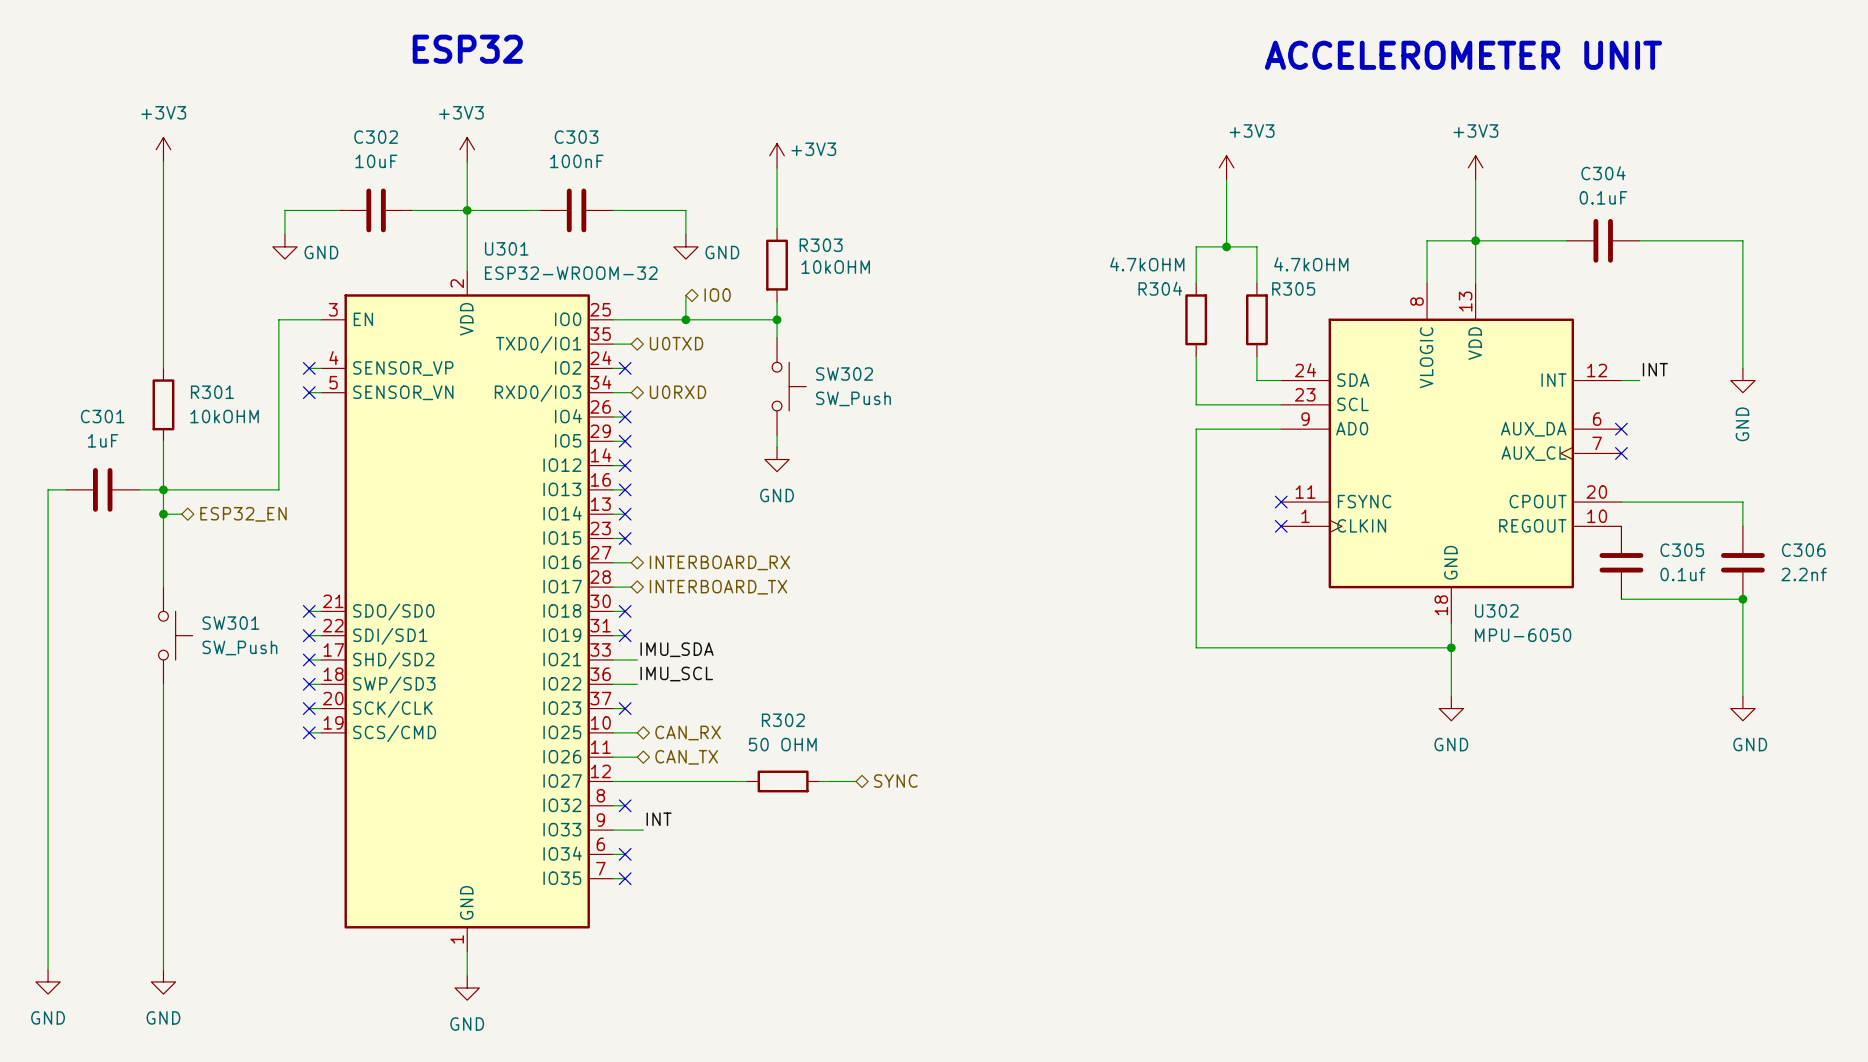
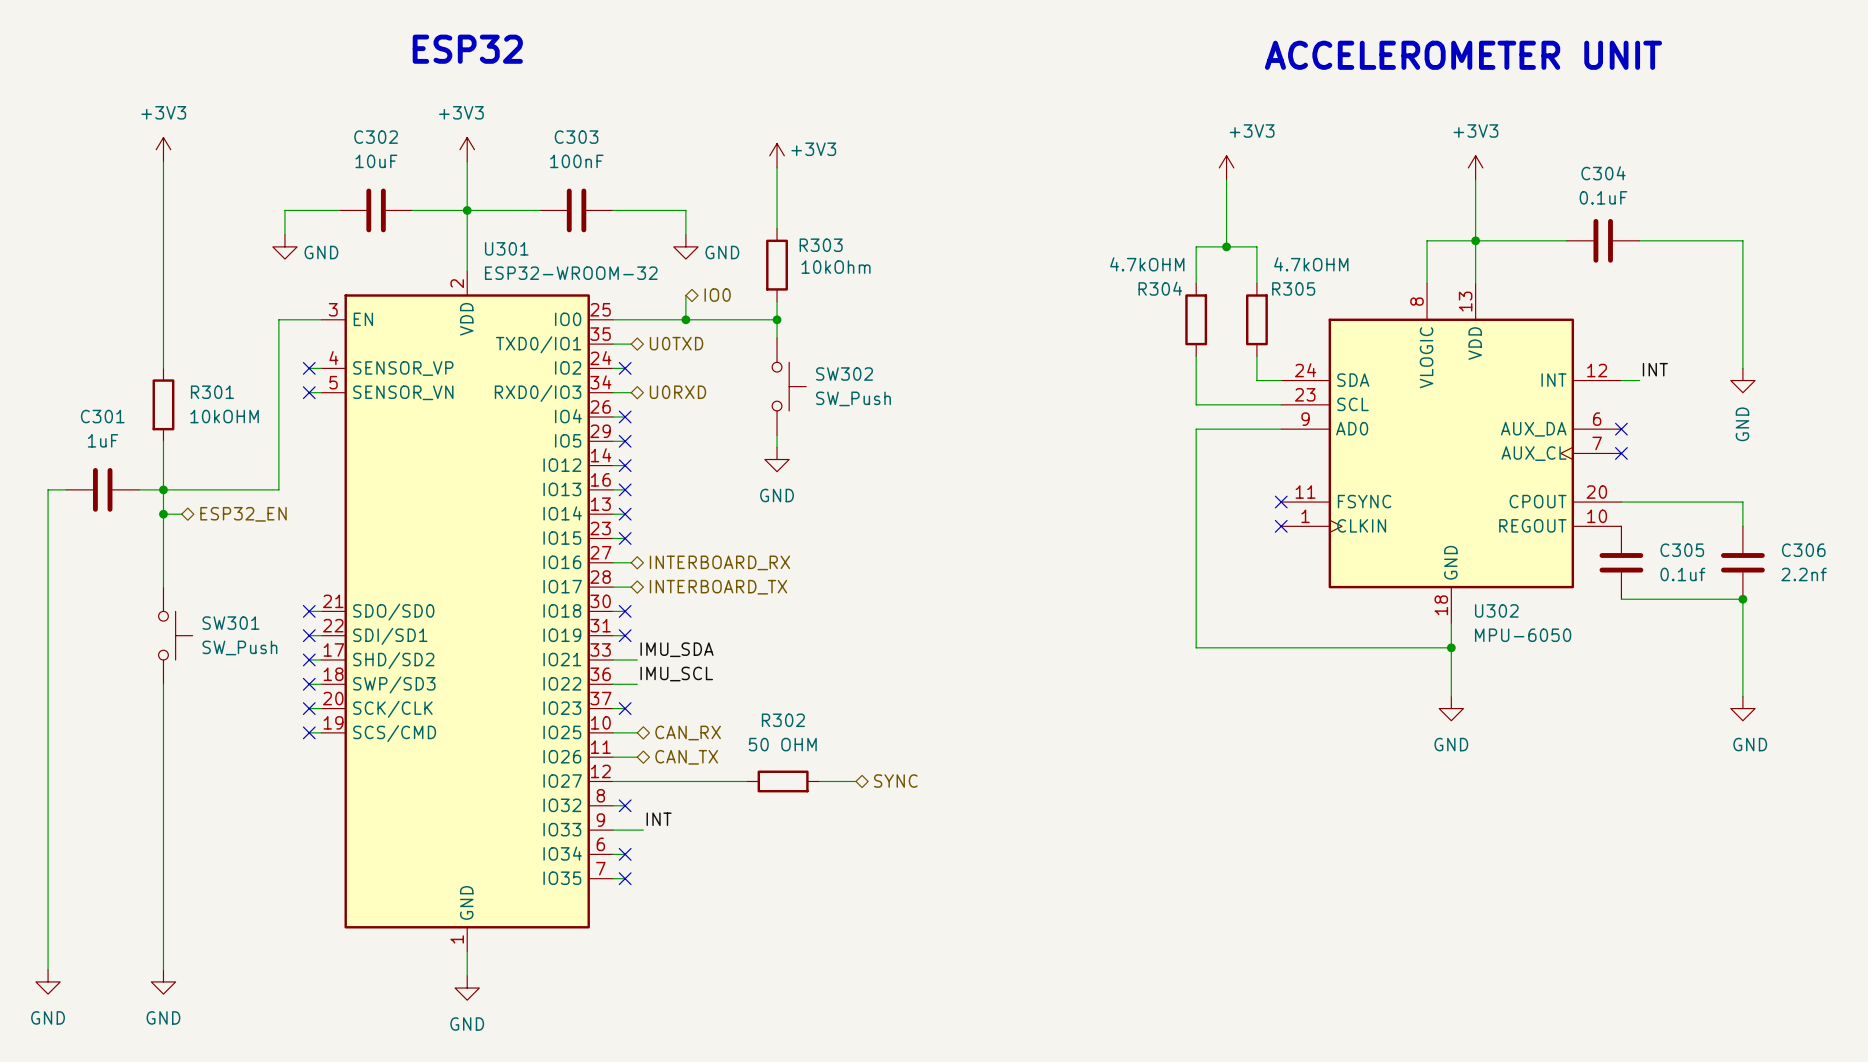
R303 value: 10kOHM (835, 267) -> 10kOhm (836, 267)

